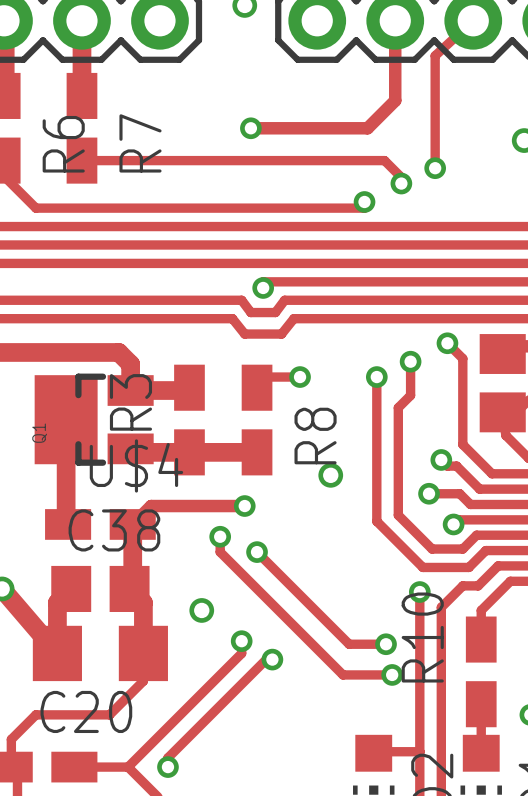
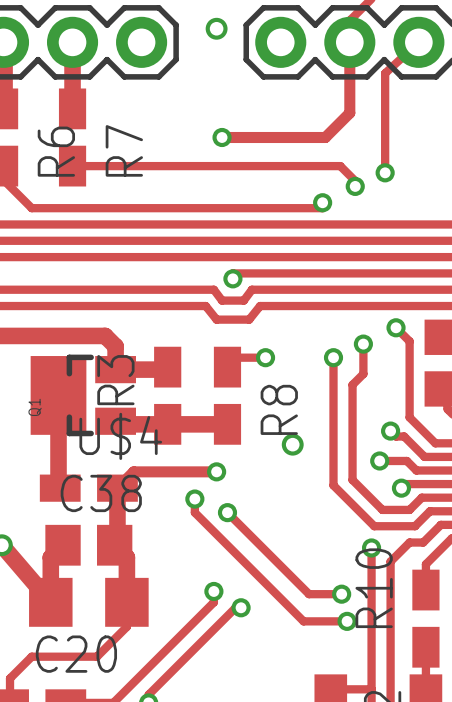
via: (201, 610) -> none

